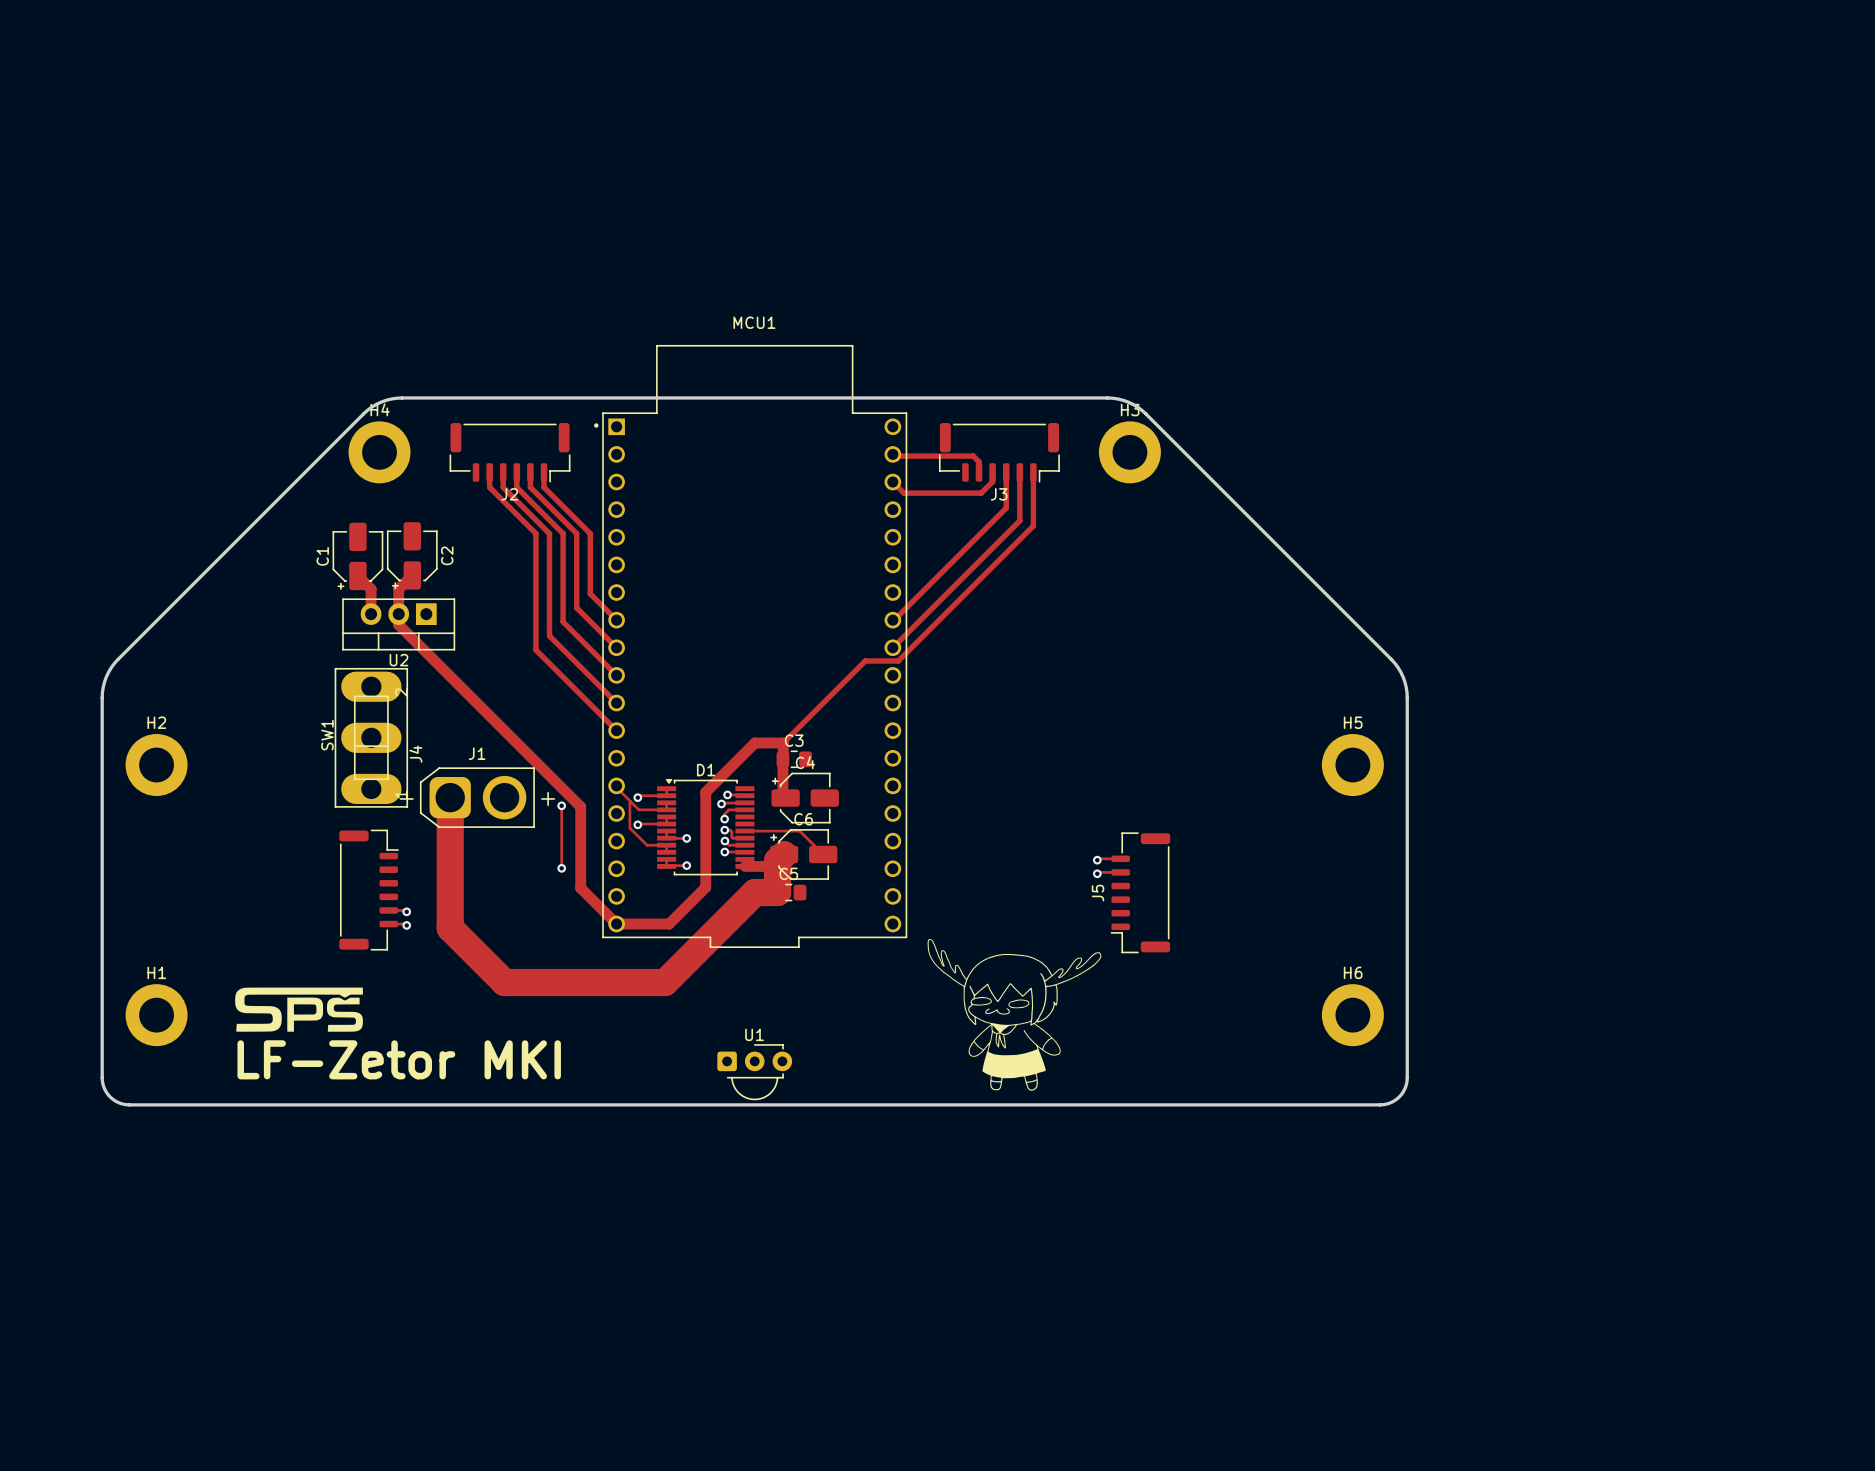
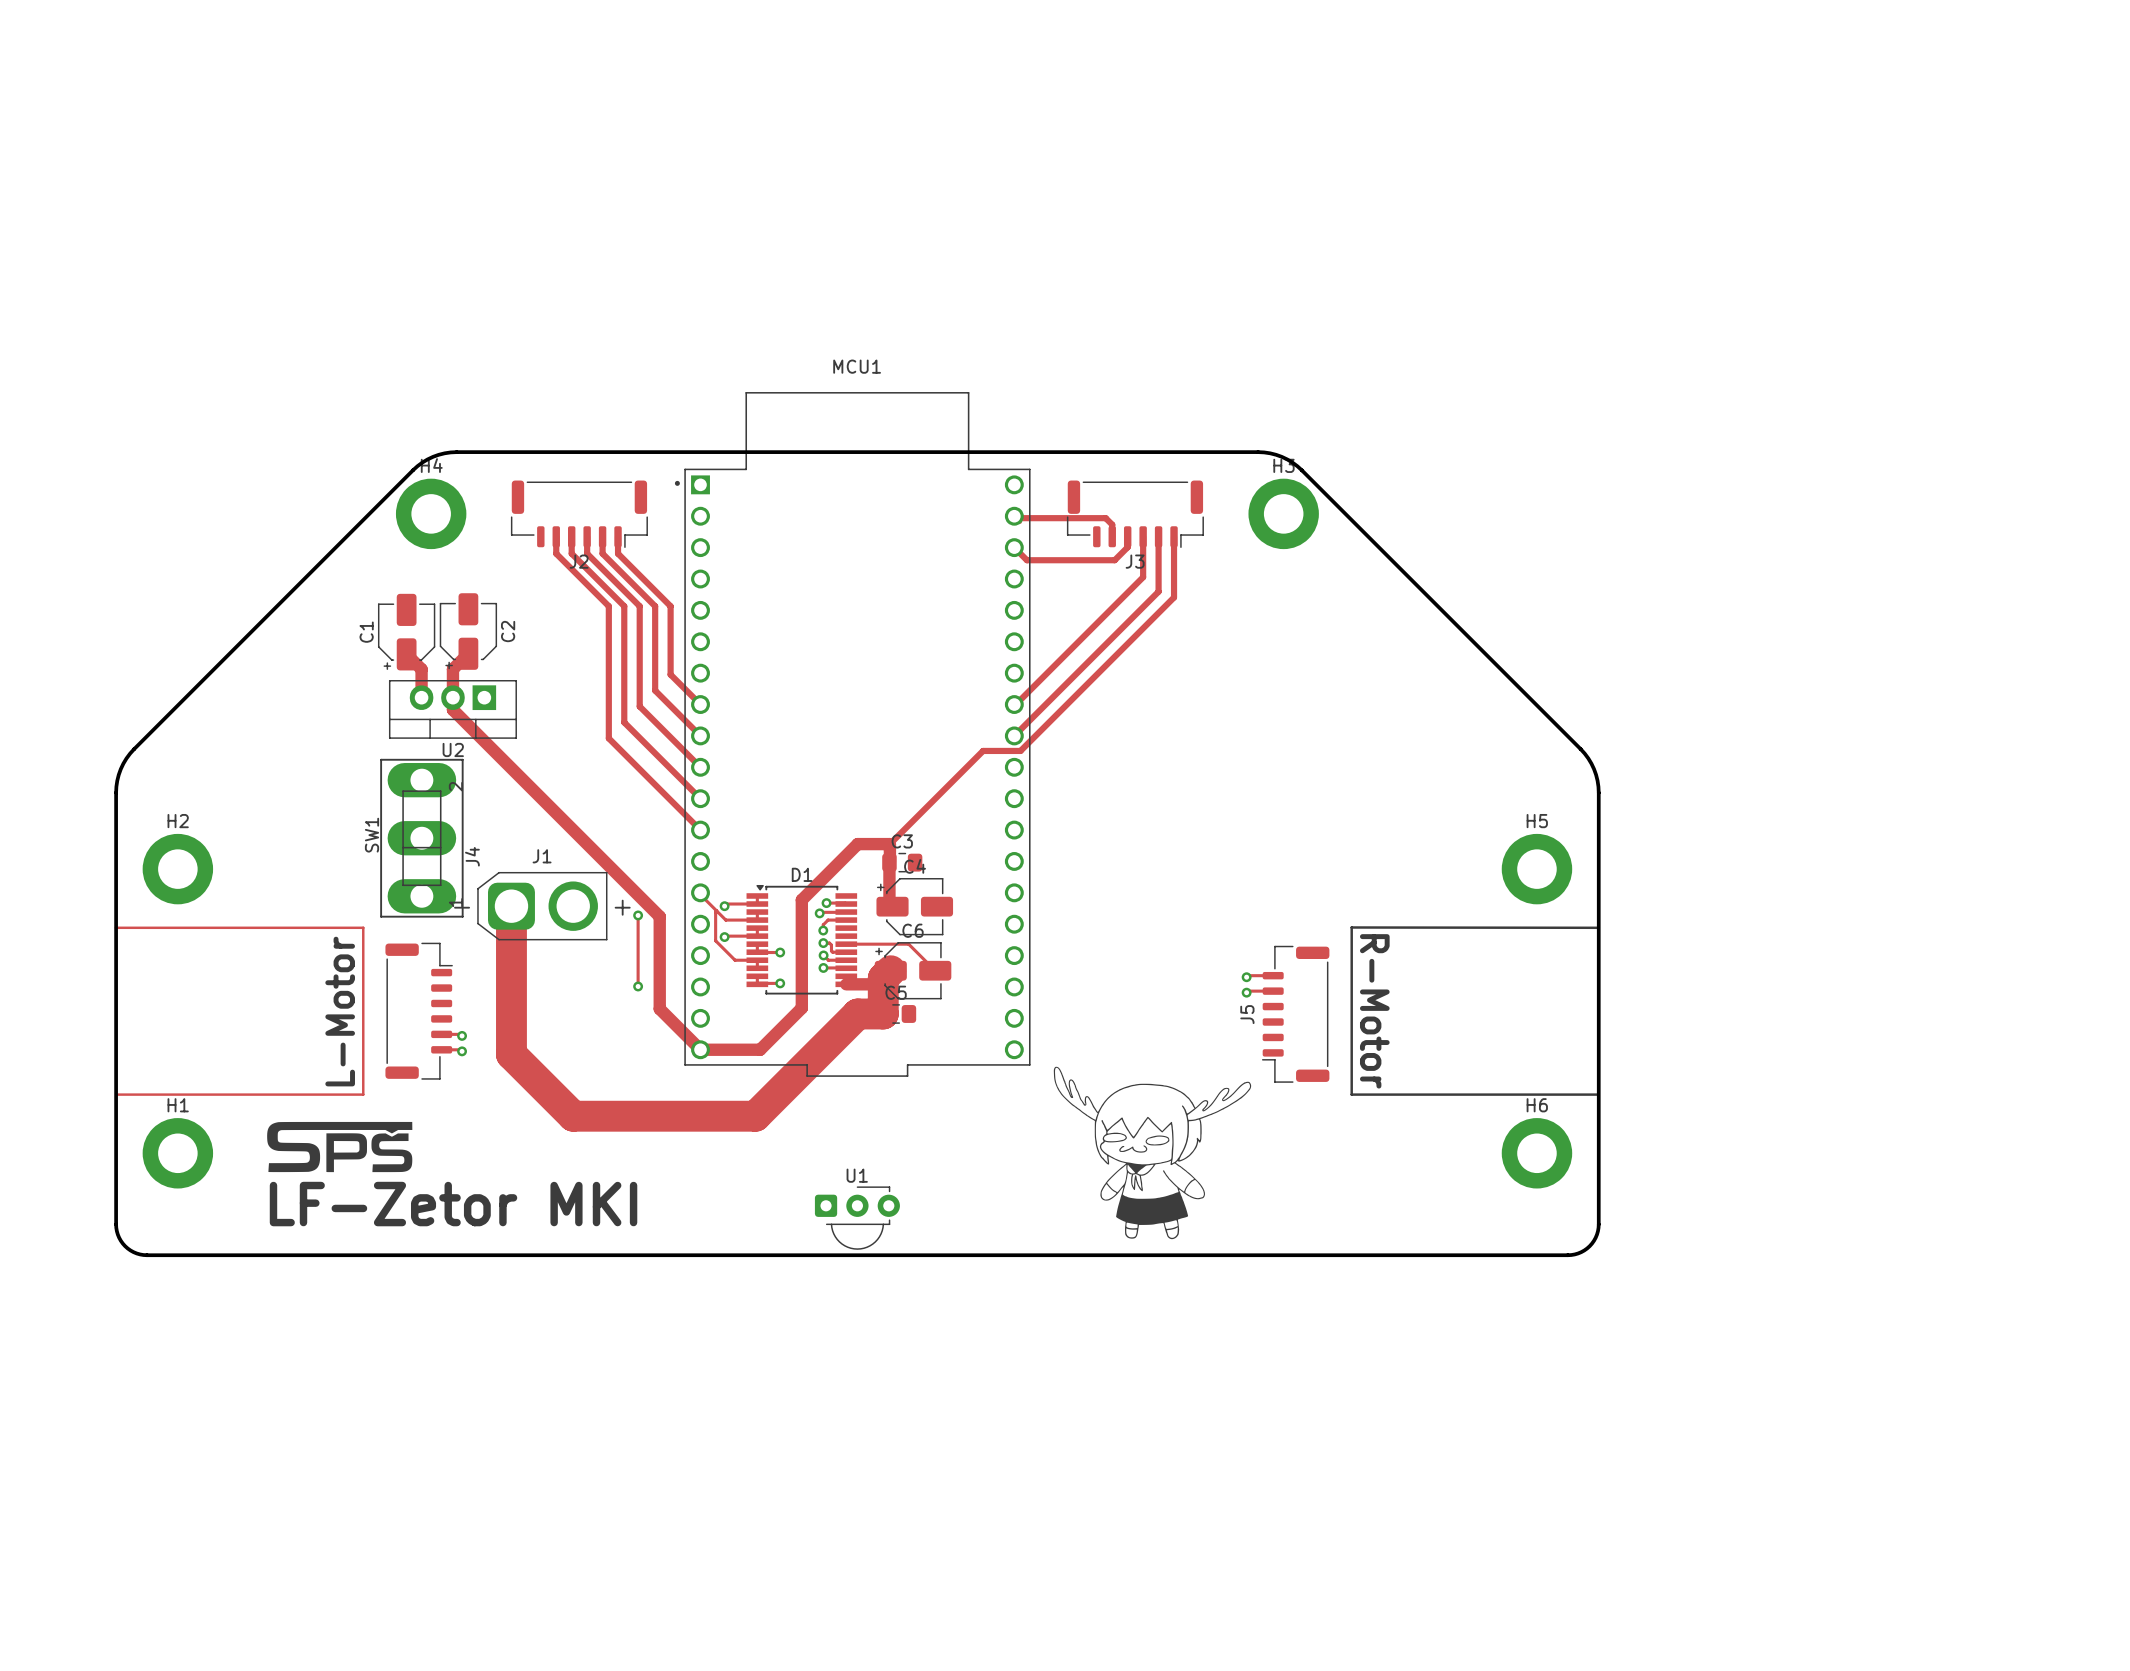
track: none -> (115, 927) (363, 927) (363, 1094) (116, 1094)
line: none -> (1598, 927) (1351, 927) (1351, 1094) (1598, 1094)
text: none -> L-Motor (340, 1011)
text: none -> R-Motor (1374, 1011)

